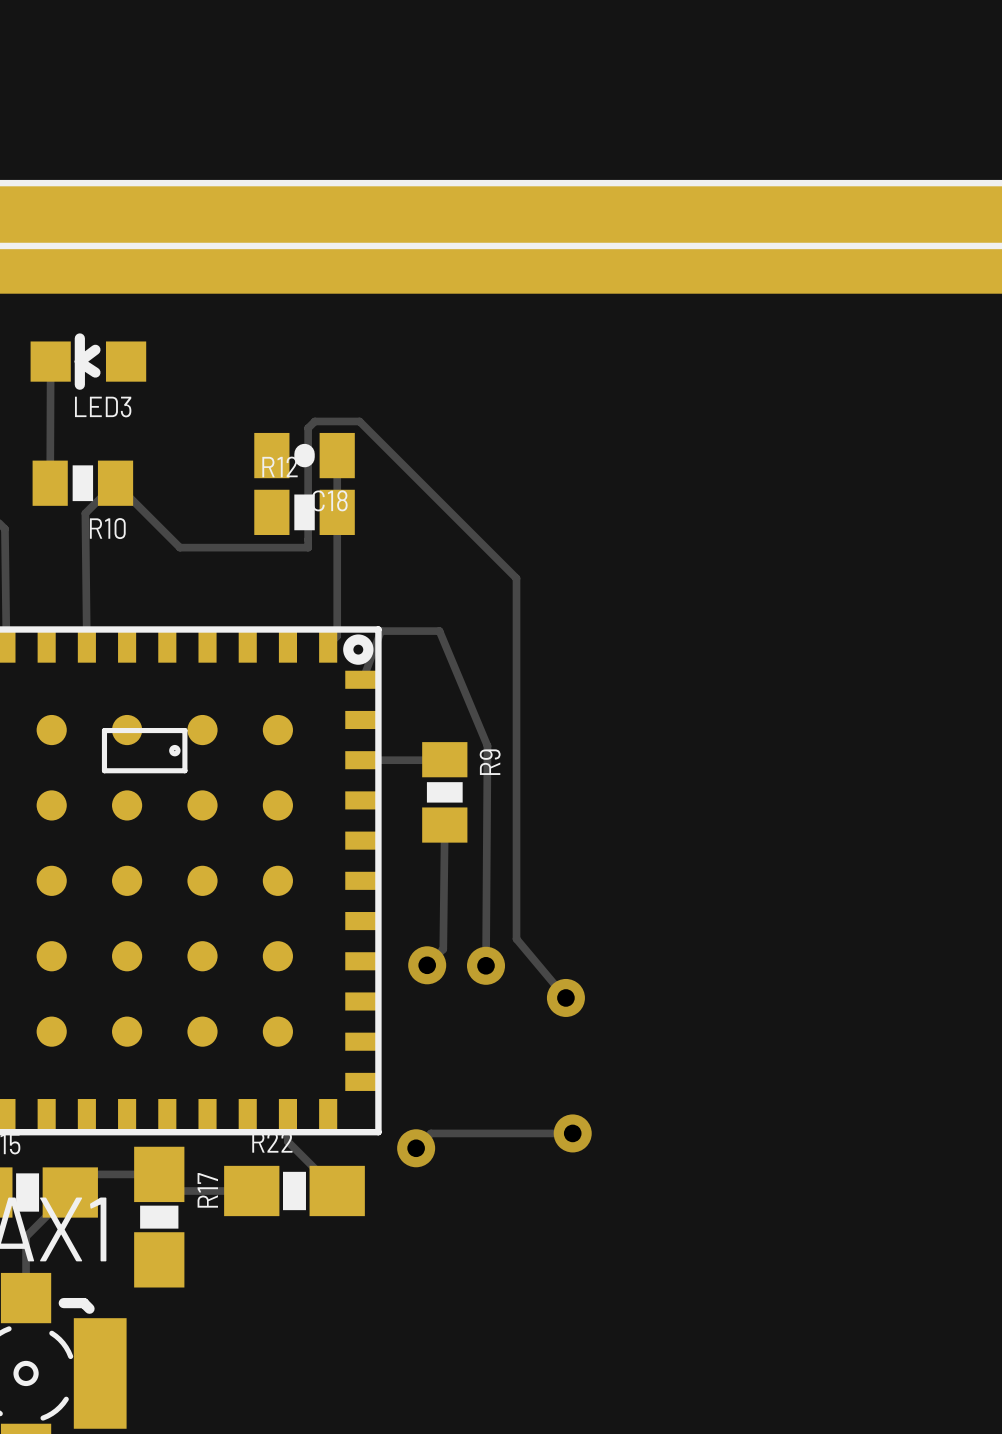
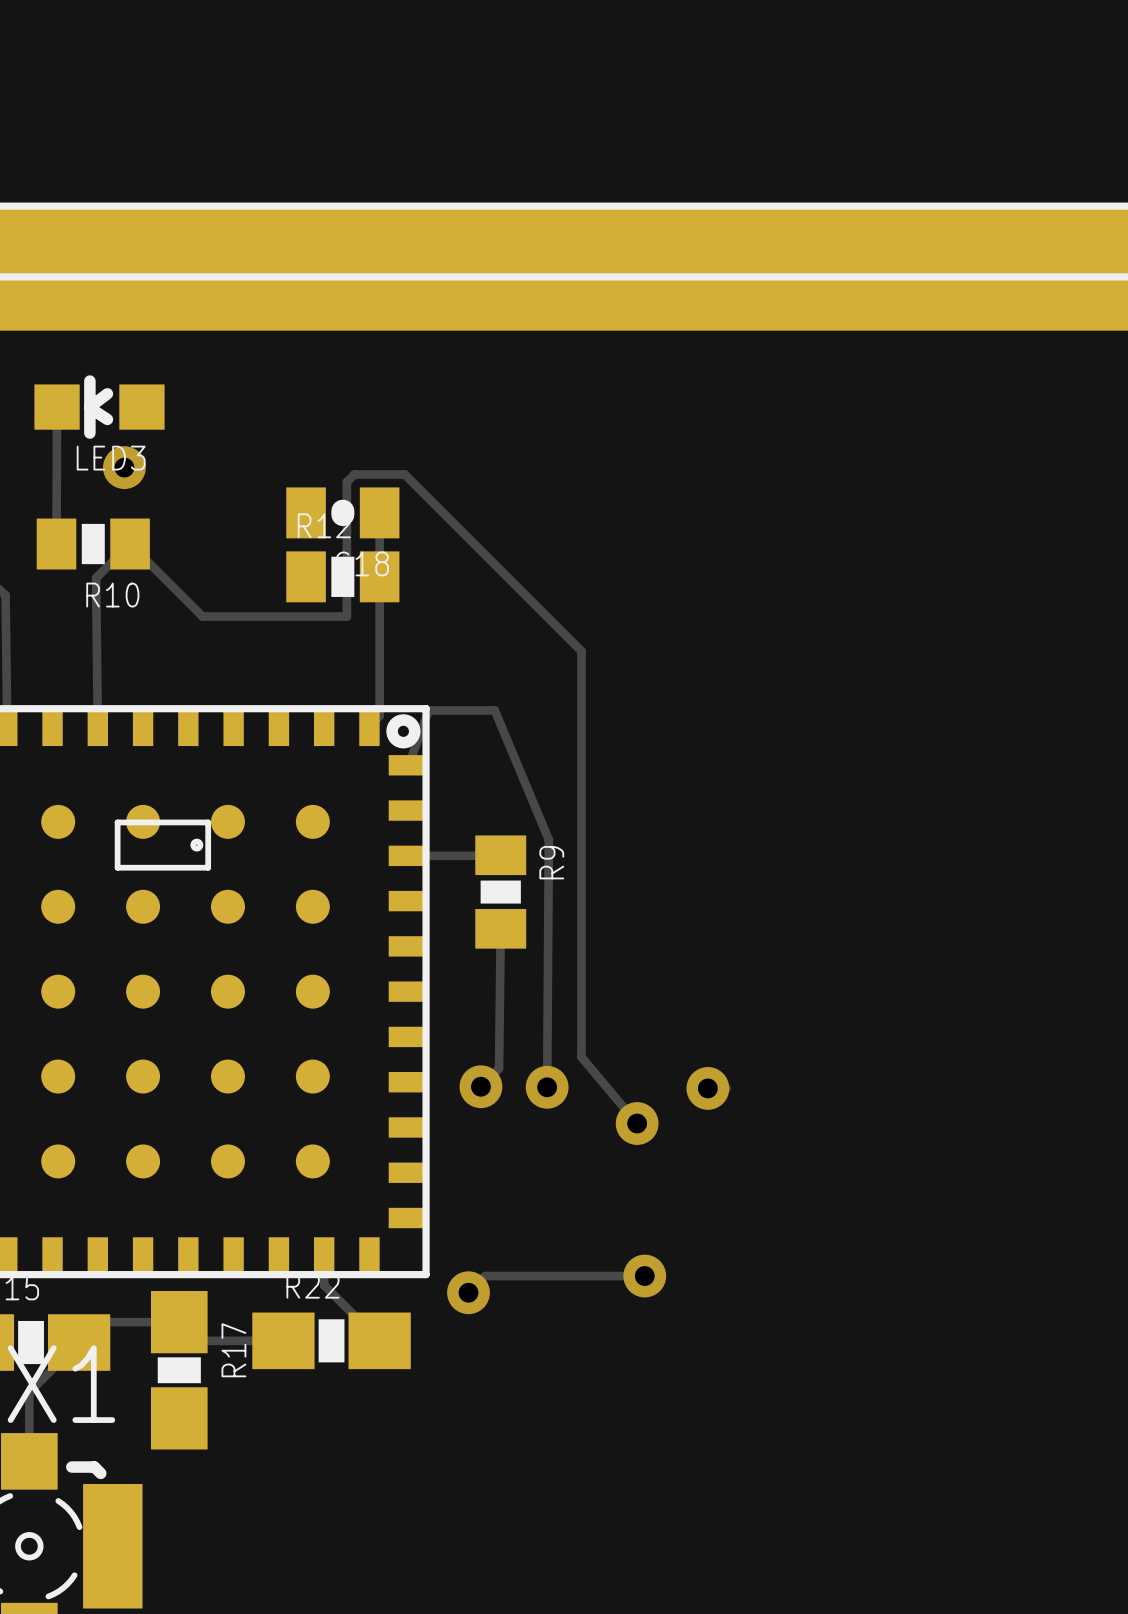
via: none -> (124, 467)
via: none -> (707, 1088)

